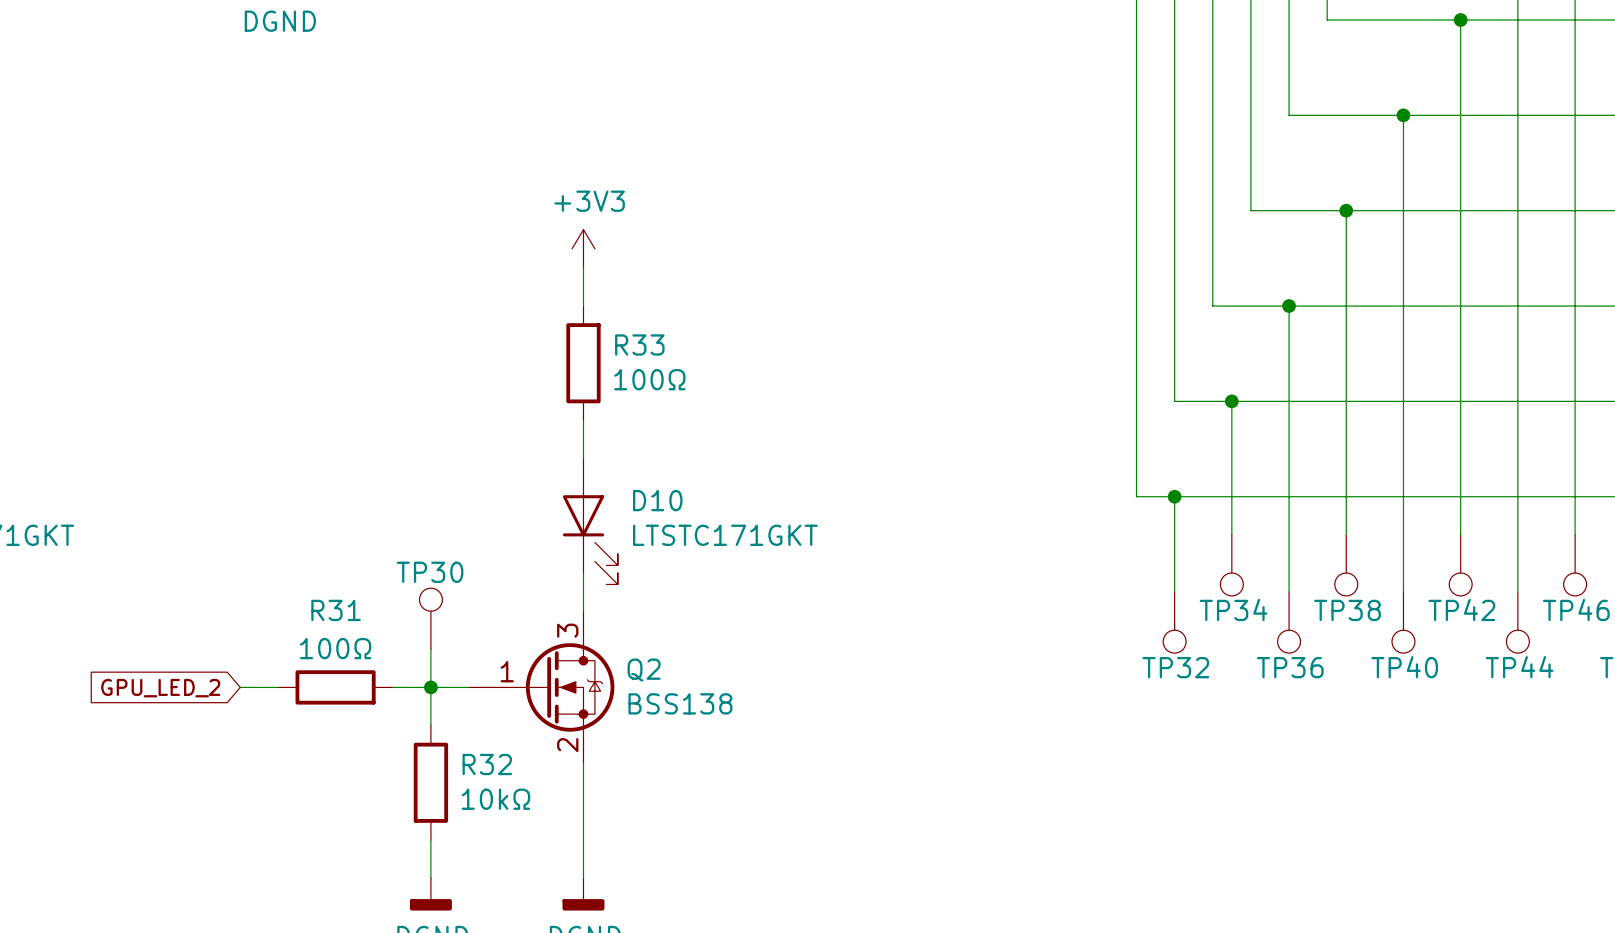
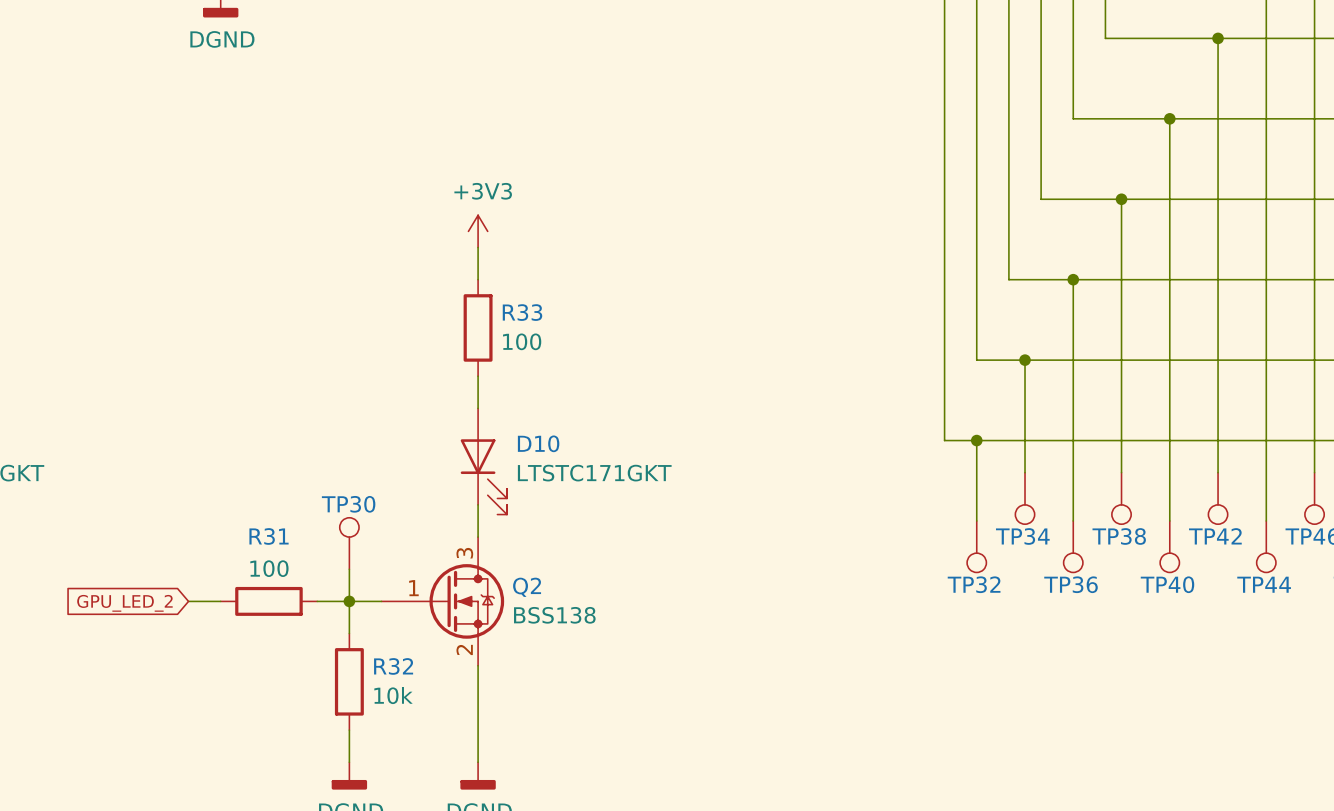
R33 value: 100Ω (649, 379) -> 100 (522, 341)
R31 value: 100Ω (335, 648) -> 100 (269, 568)
R32 value: 10kΩ (495, 799) -> 10k (393, 695)

